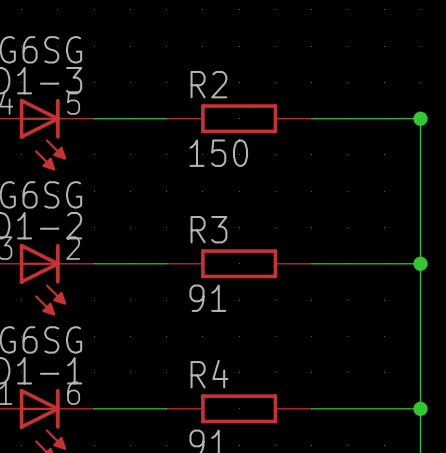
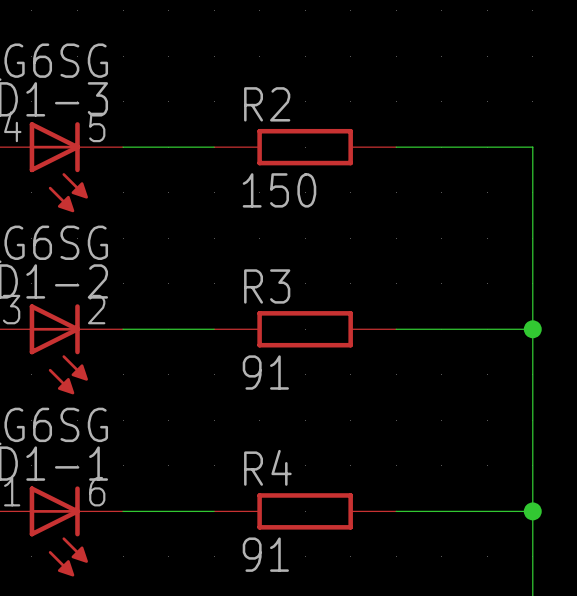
junction: (420, 118) -> none

